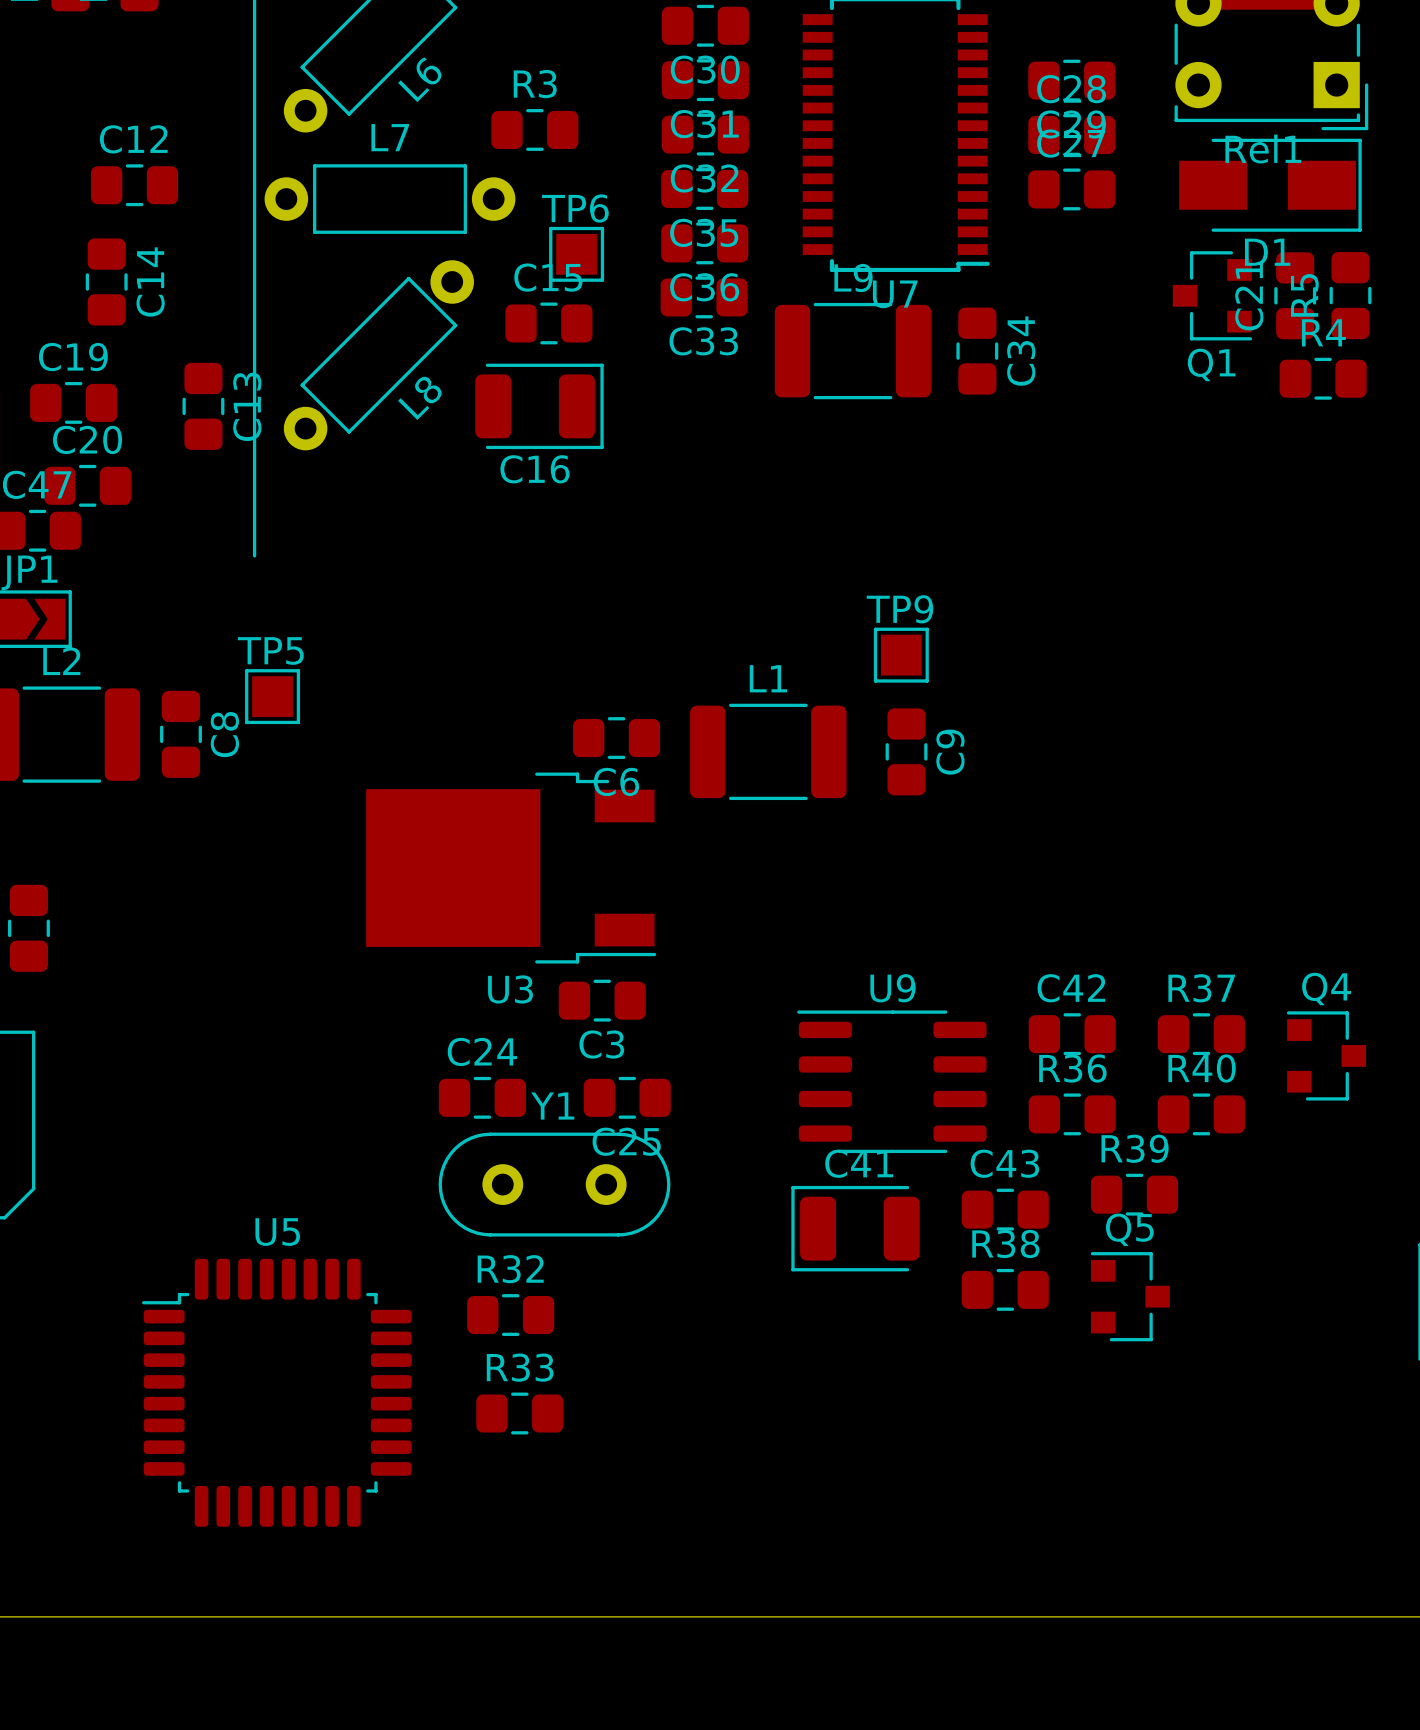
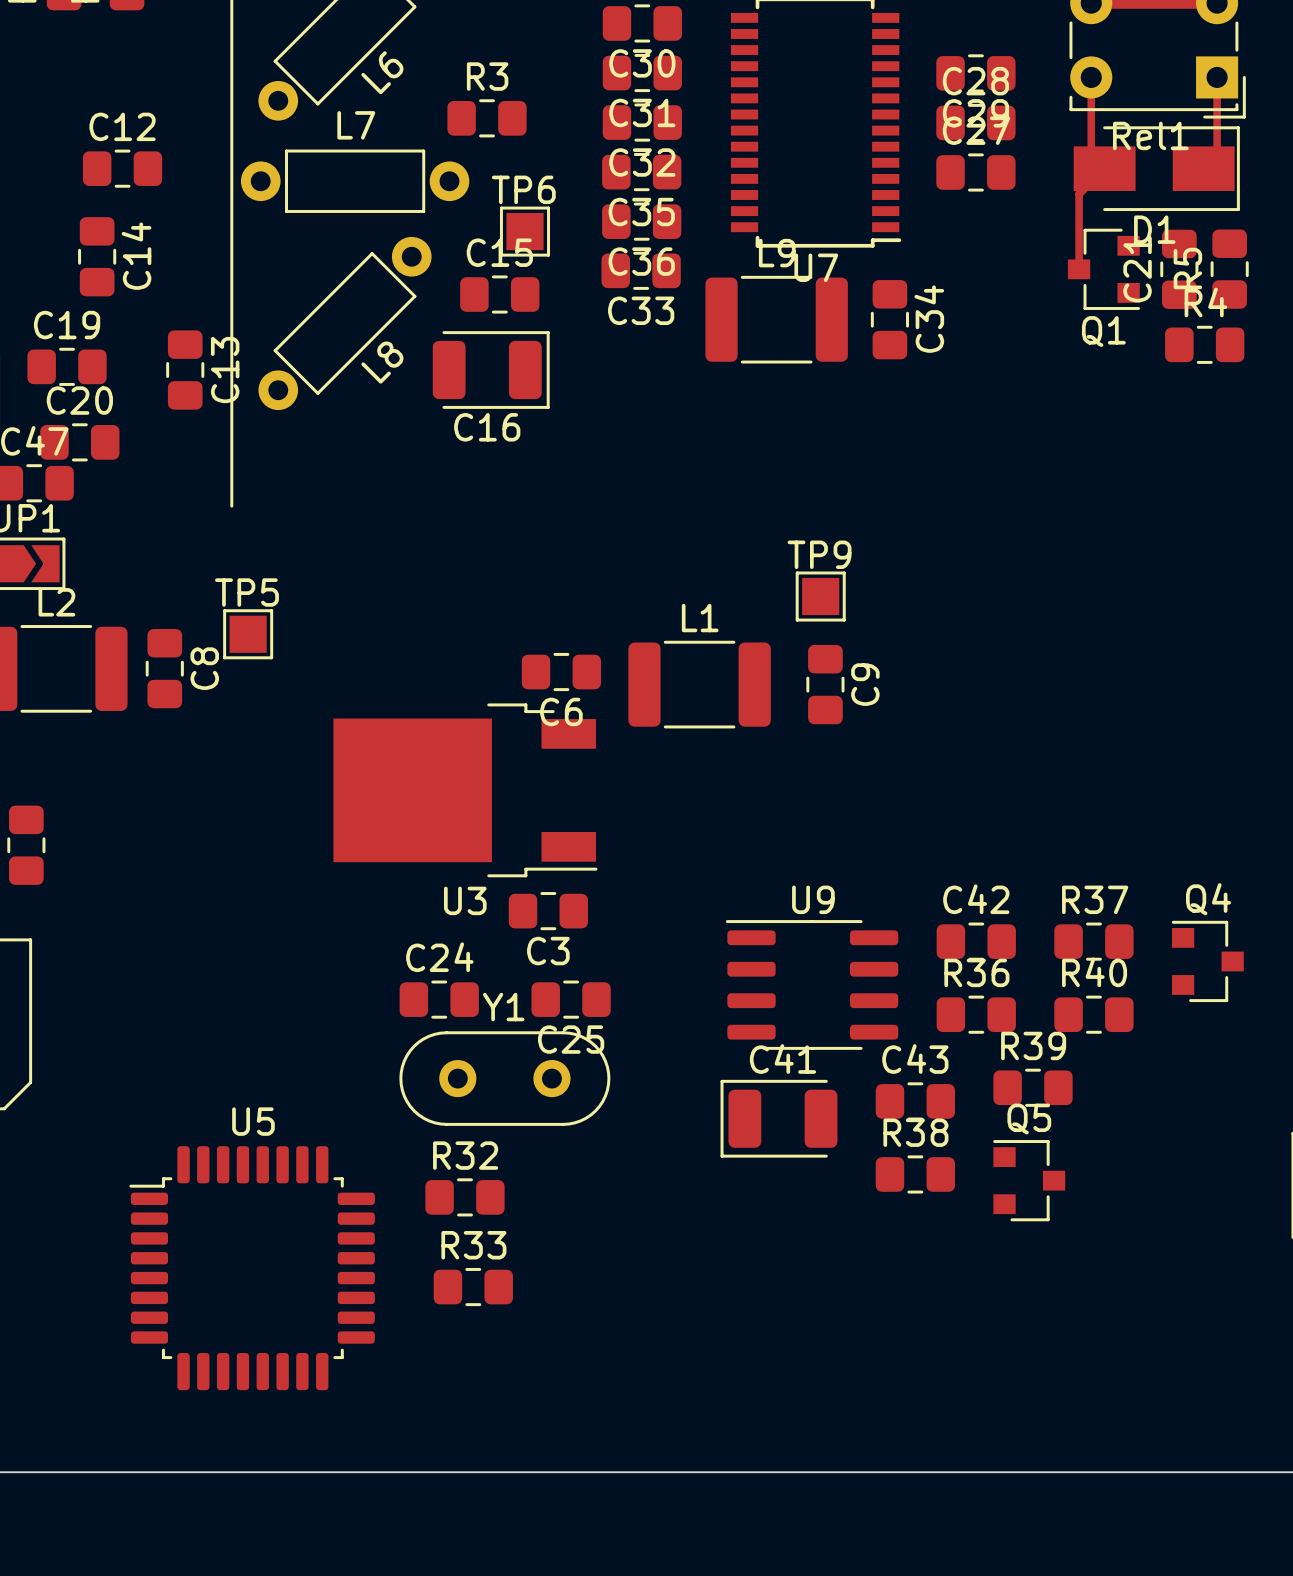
top track: none -> (1091, 77) (1091, 155) (1104, 168) (1079, 194) (1079, 269)
top track: none -> (1217, 77) (1217, 155) (1203, 168)

